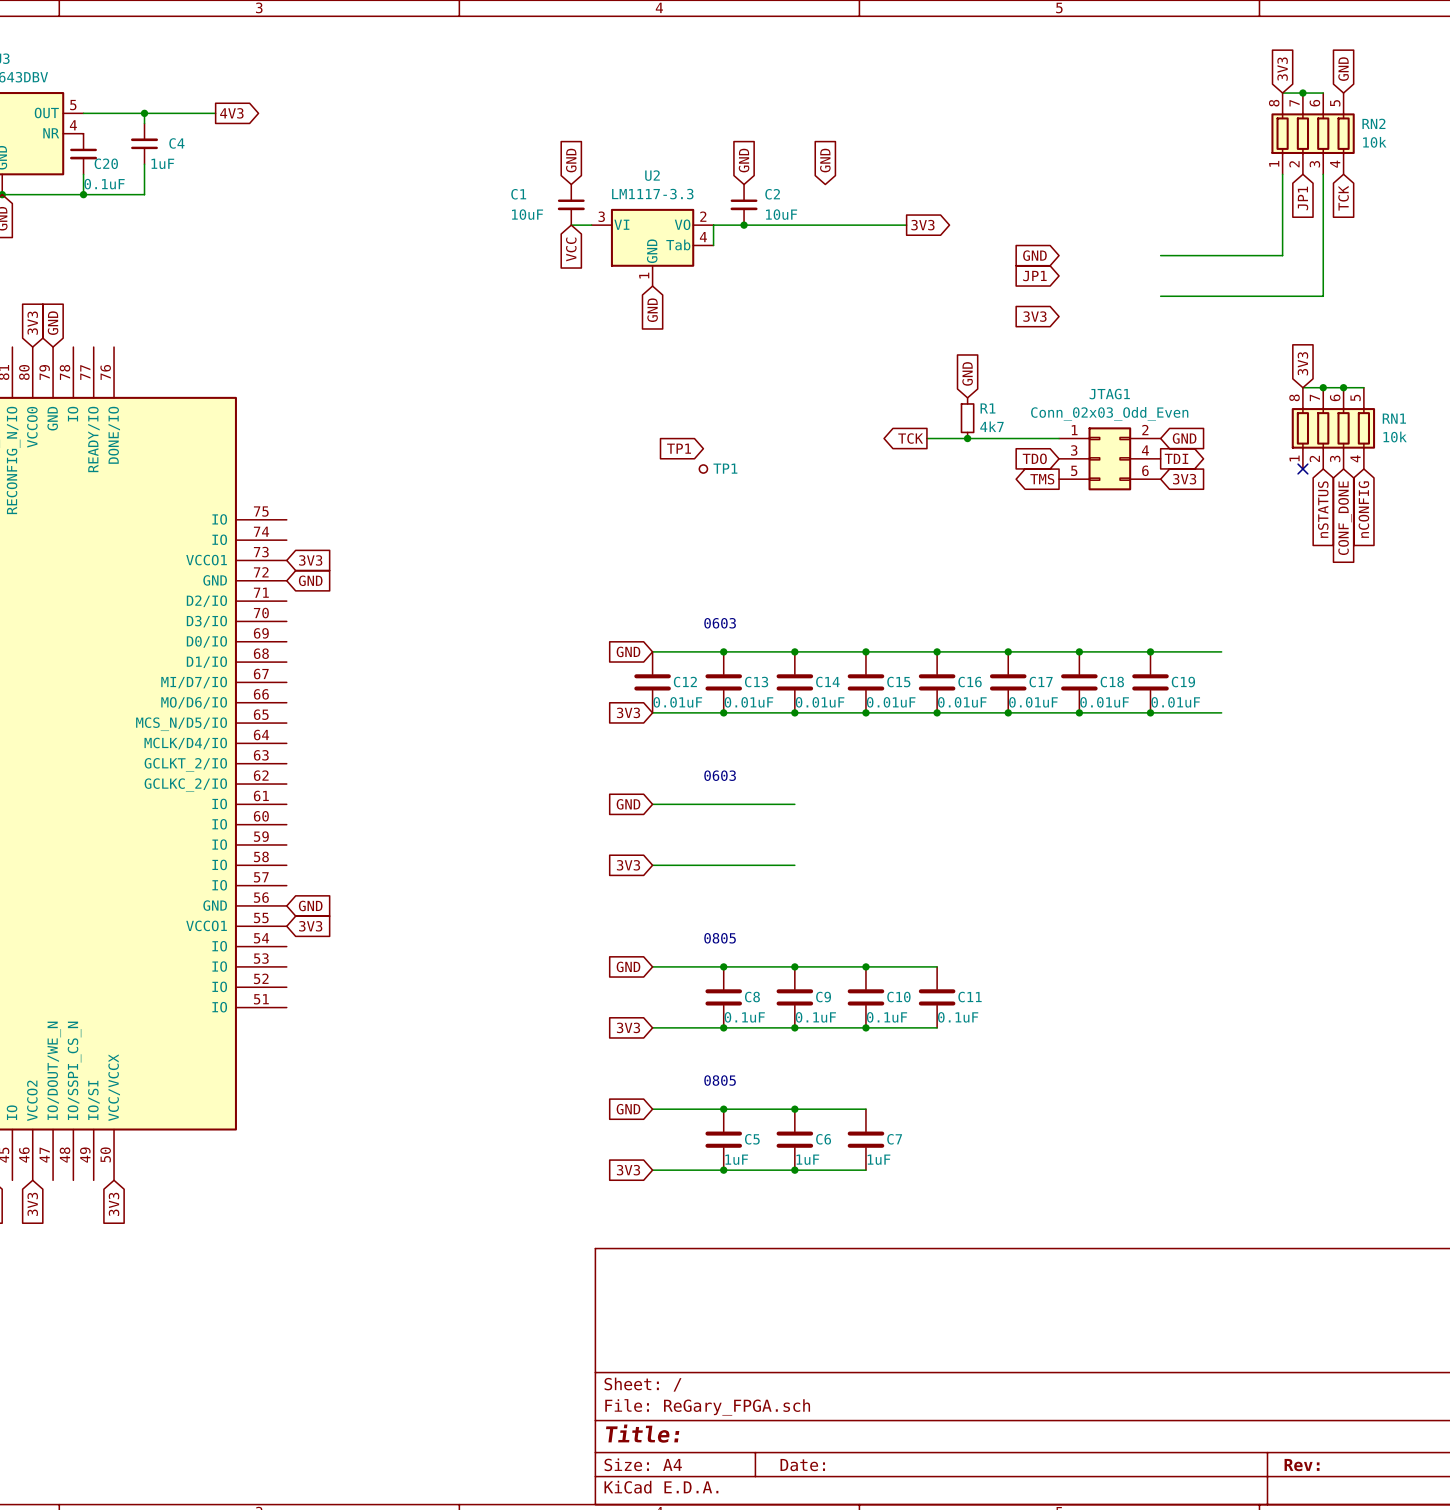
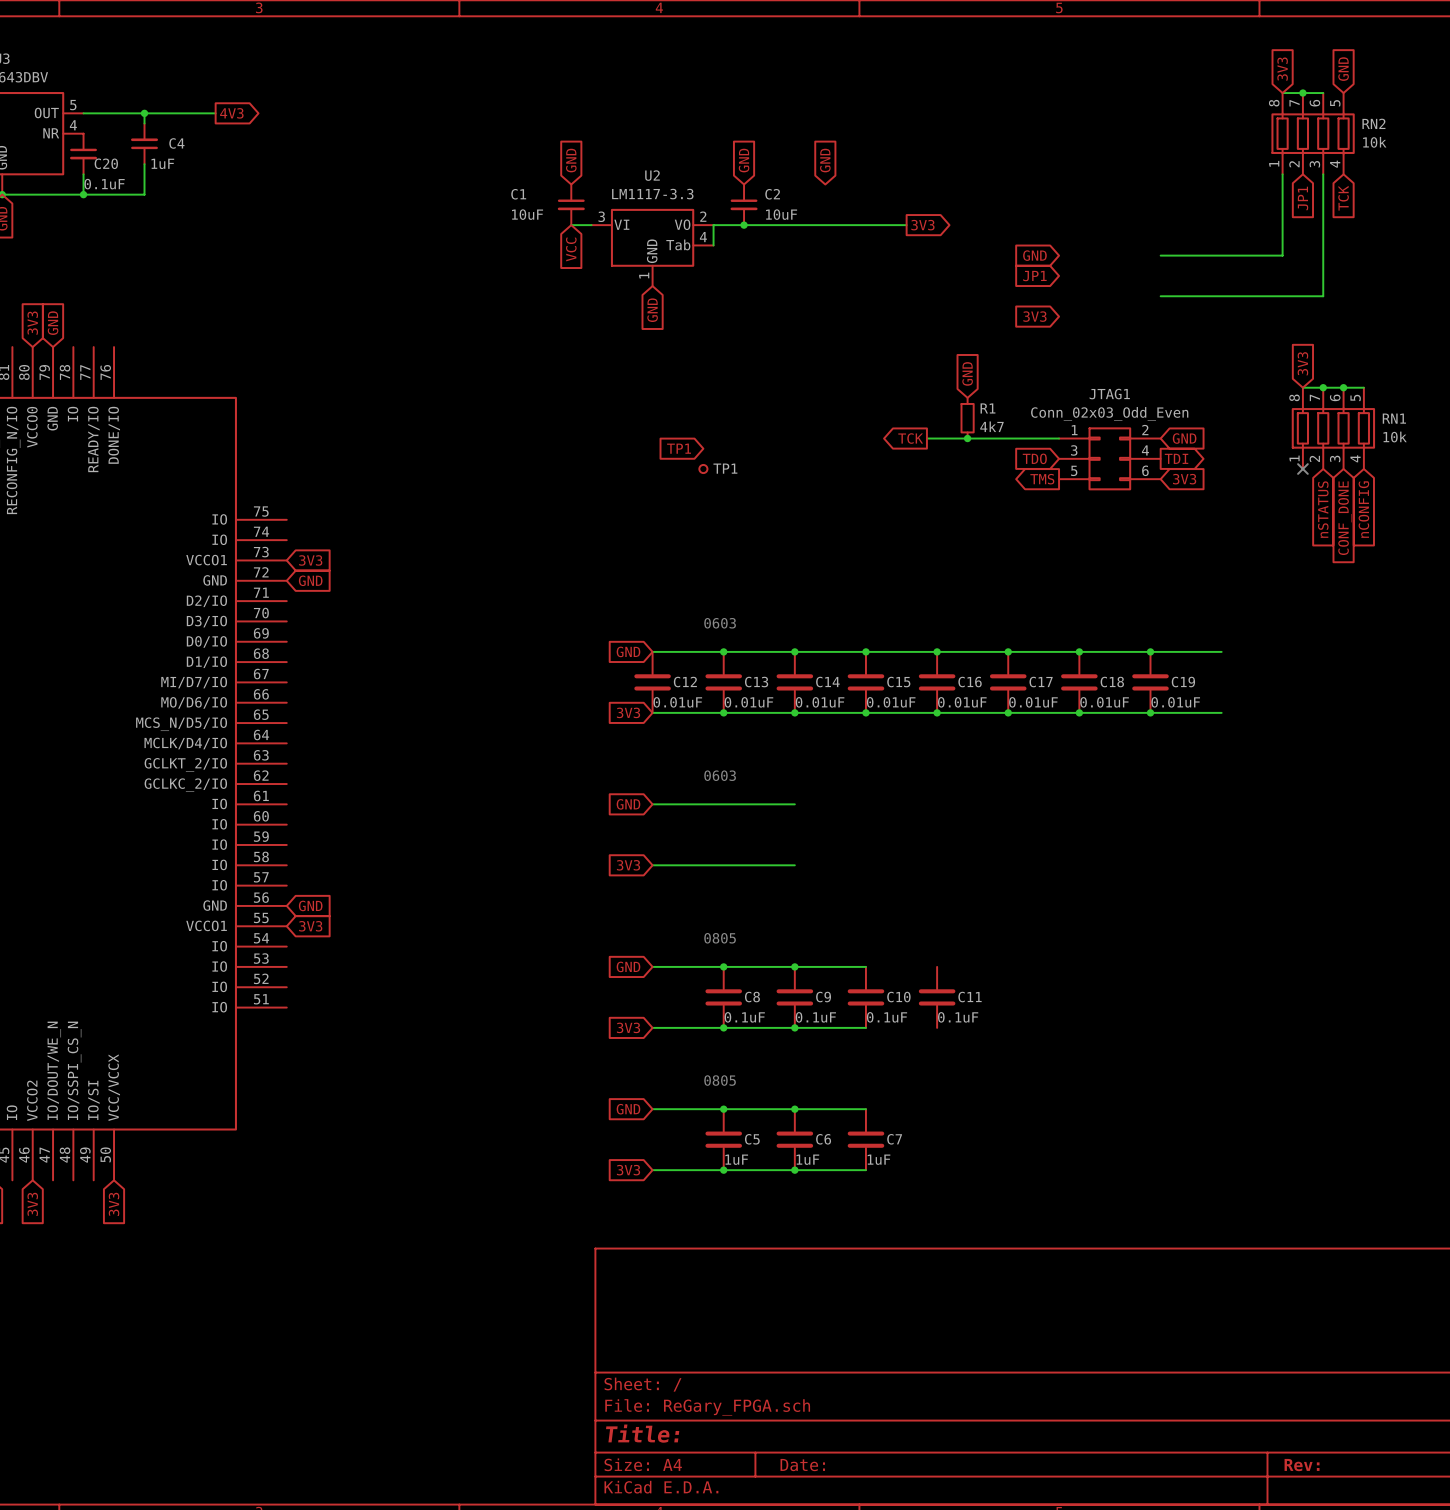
wire: (865, 966) (937, 966) -> none
junction: (865, 966) -> none
wire: (865, 1027) (937, 1027) -> none
junction: (865, 1027) -> none

